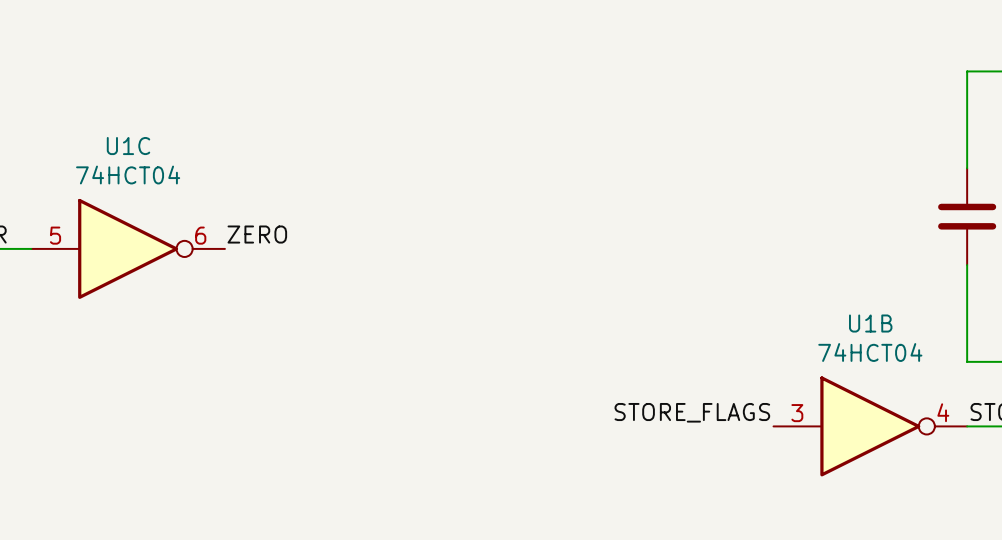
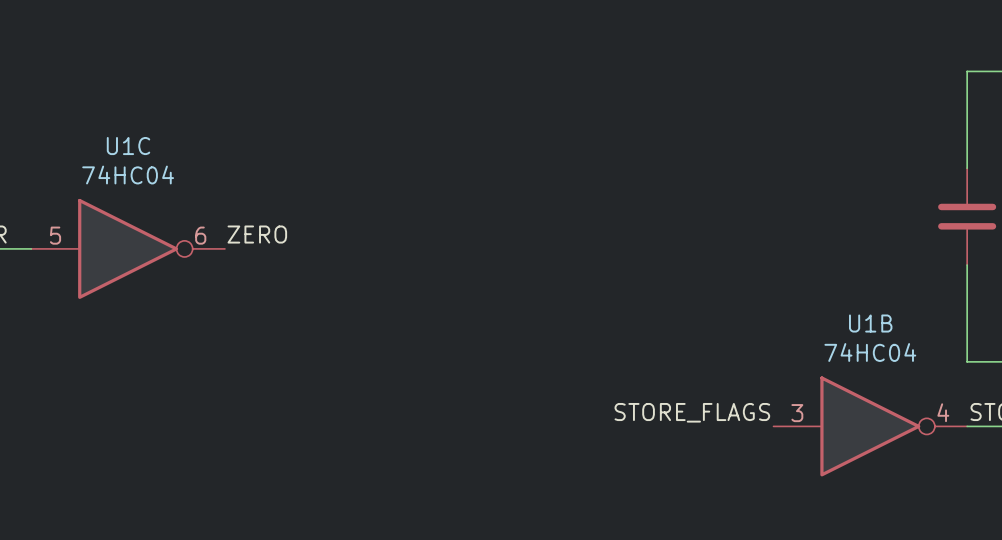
U1C value: 74HCT04 (128, 175) -> 74HC04 (128, 175)
U1B value: 74HCT04 (870, 352) -> 74HC04 (870, 352)

